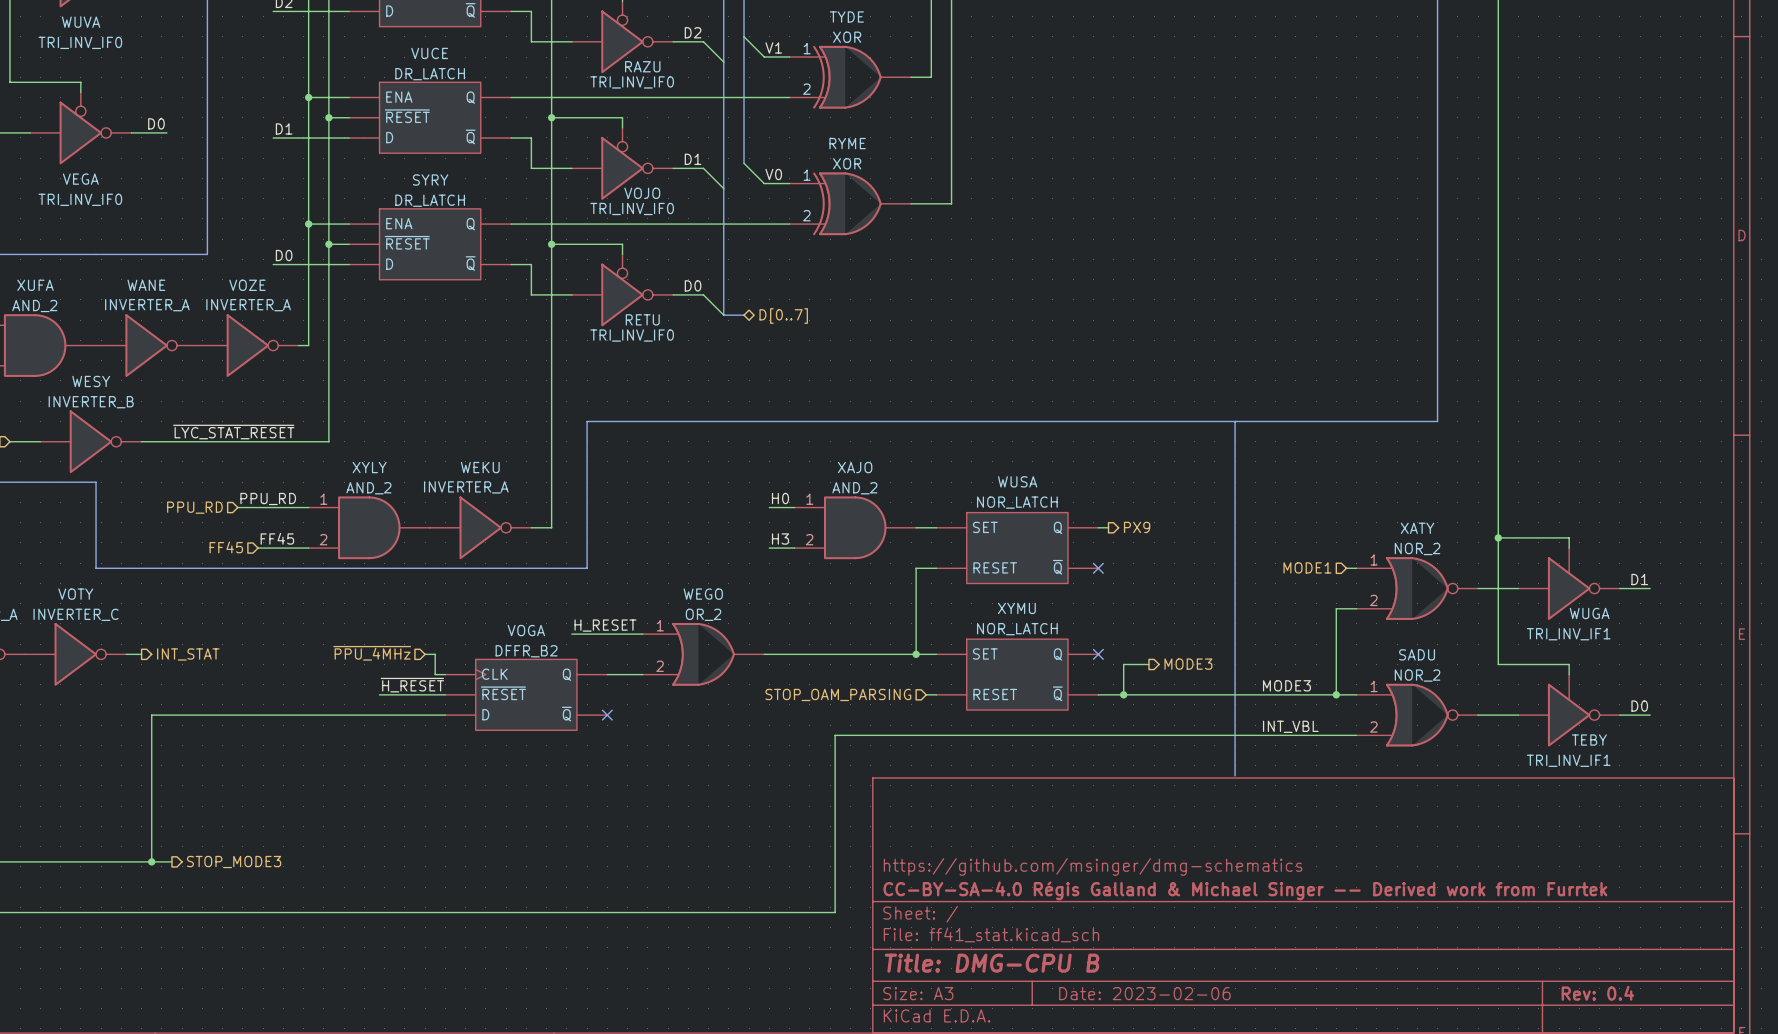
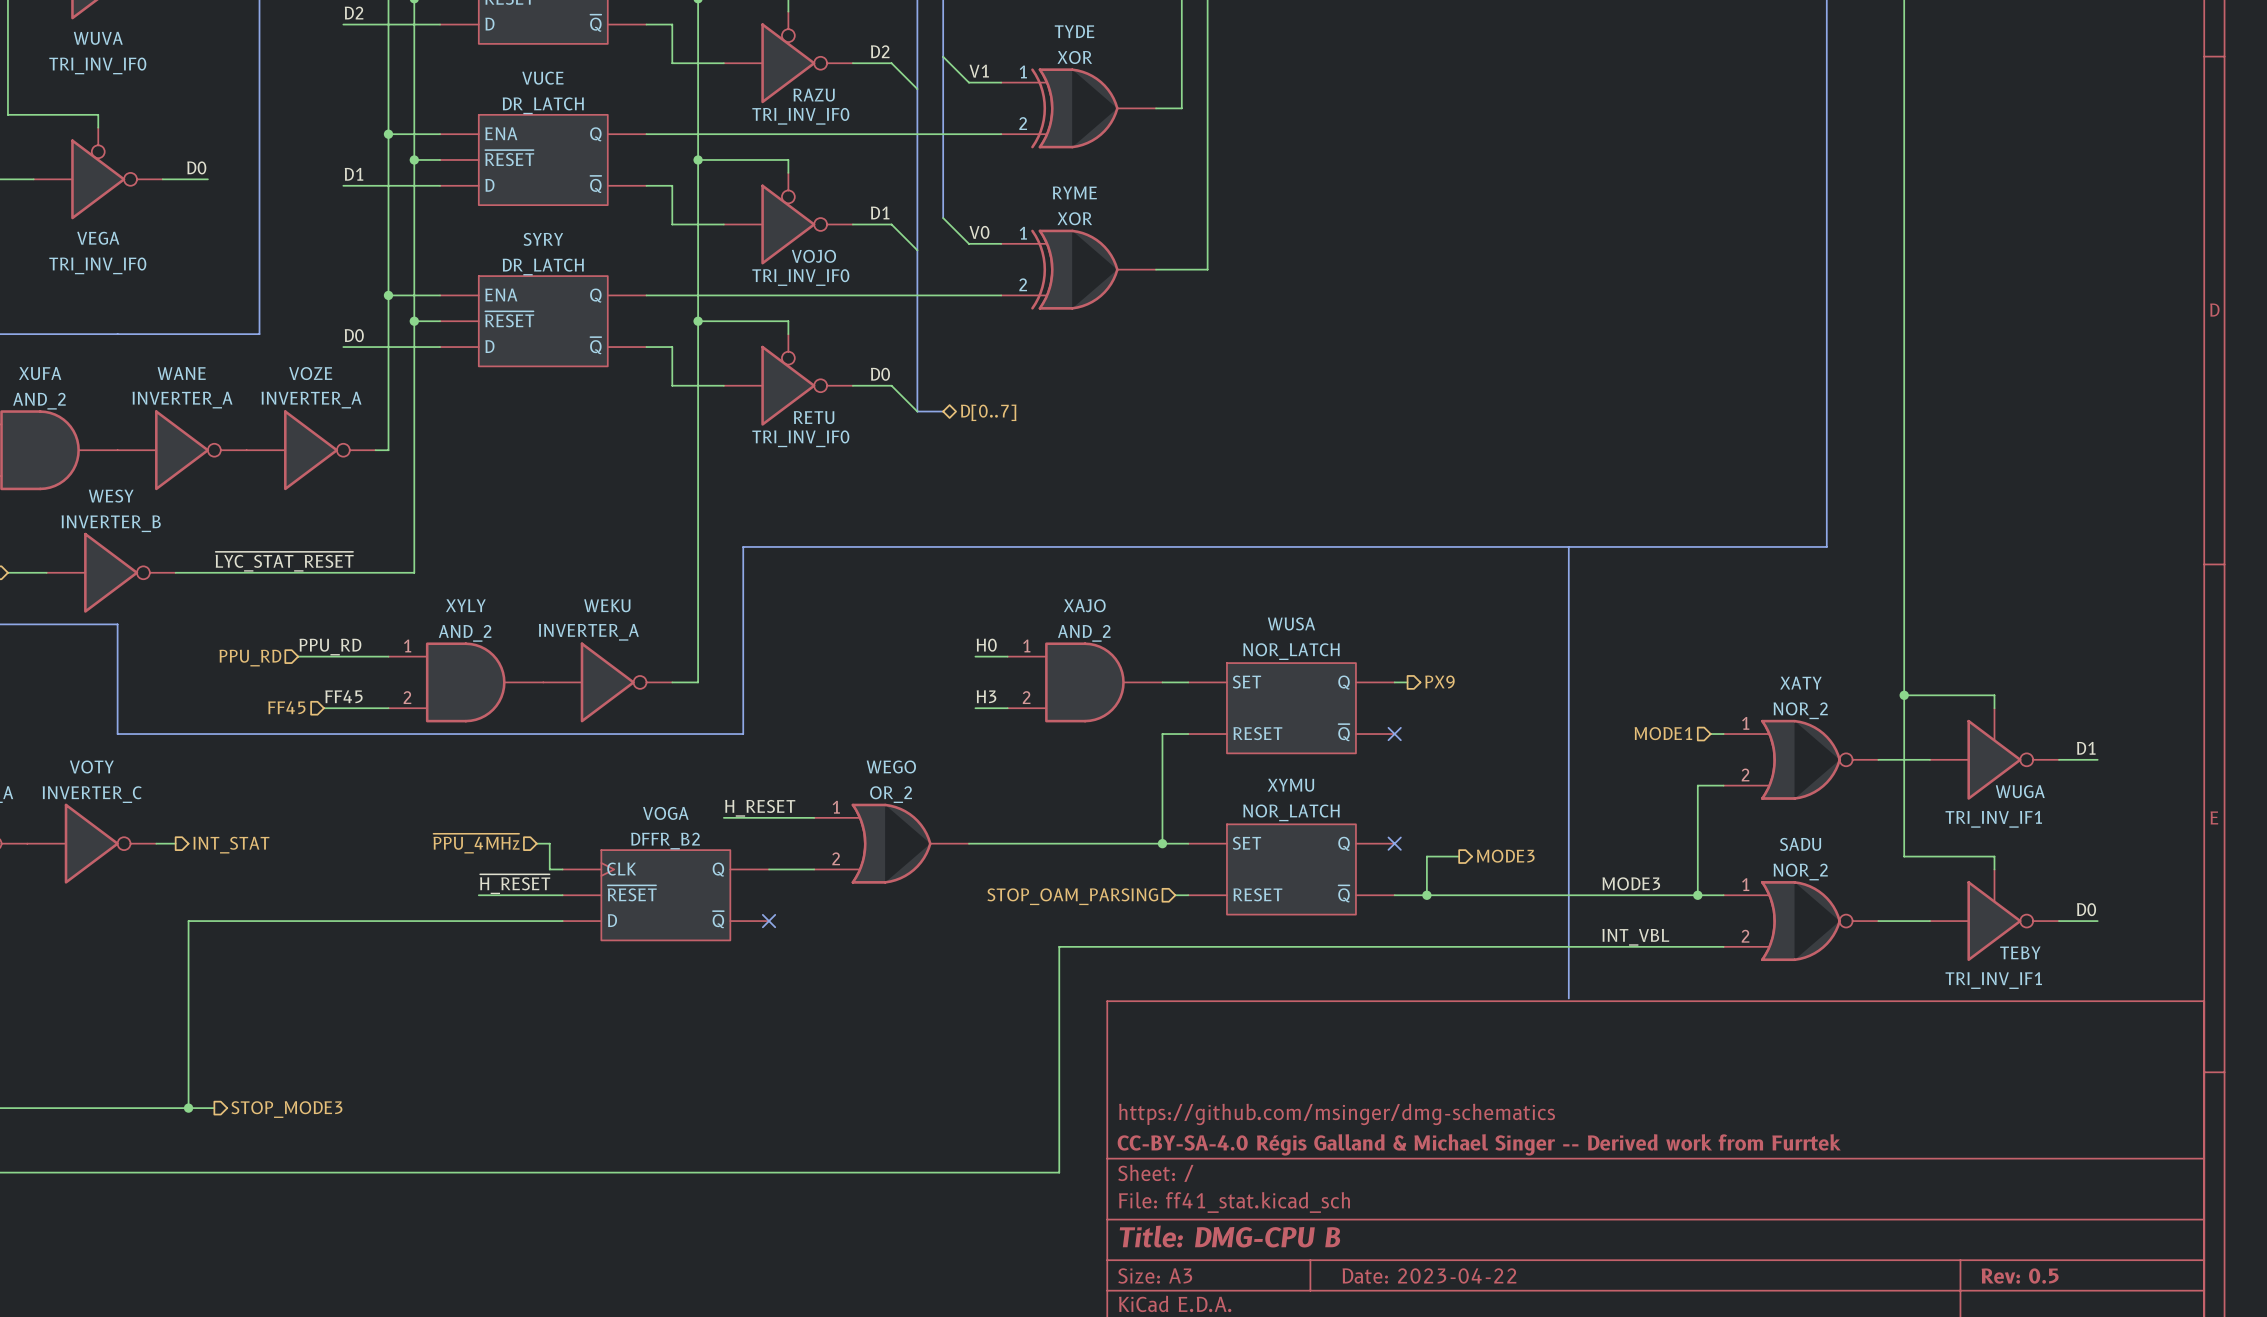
title block: Date: 2023-02-06 (1144, 993) -> Date: 2023-04-22 (1429, 1275)
title block: Rev: 0.4 (1597, 993) -> Rev: 0.5 (2020, 1276)

